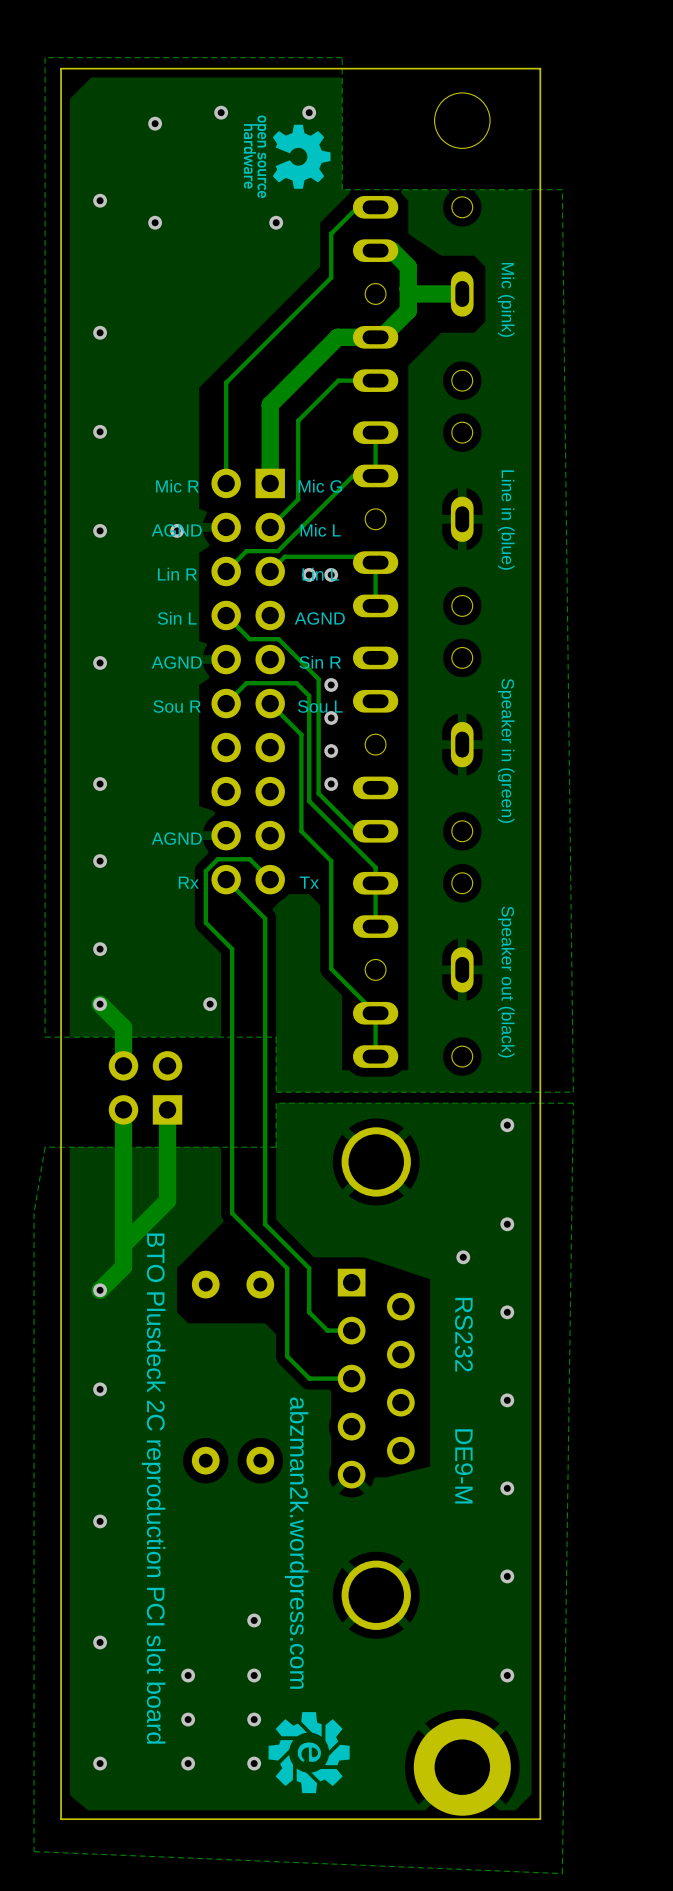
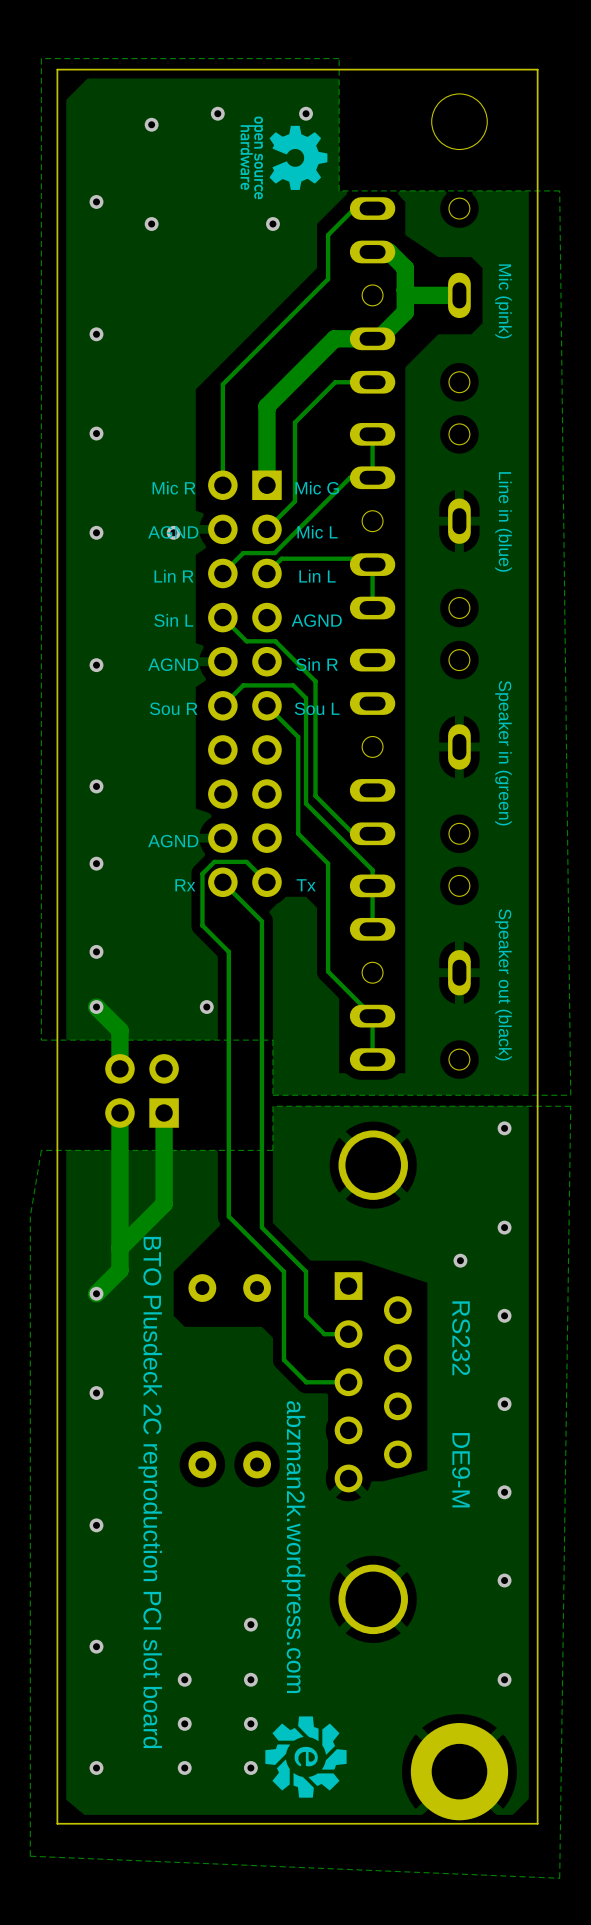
via: (309, 574) -> none
via: (331, 574) -> none
via: (331, 684) -> none
via: (331, 718) -> none
via: (331, 751) -> none
via: (331, 784) -> none

